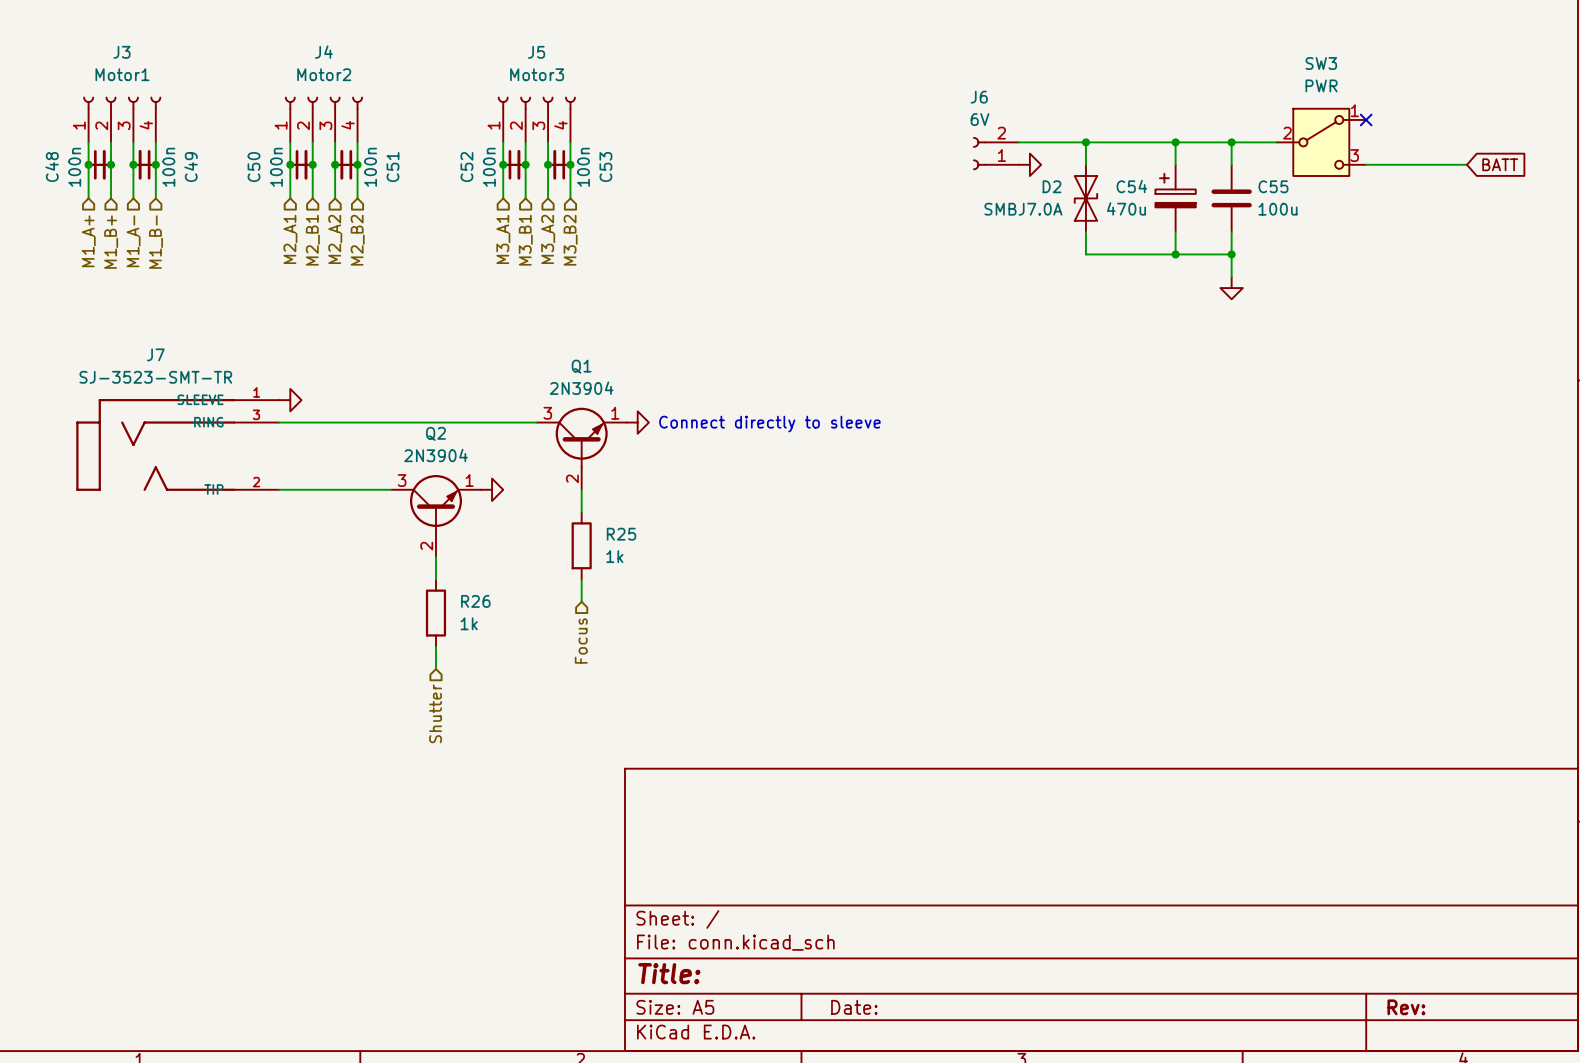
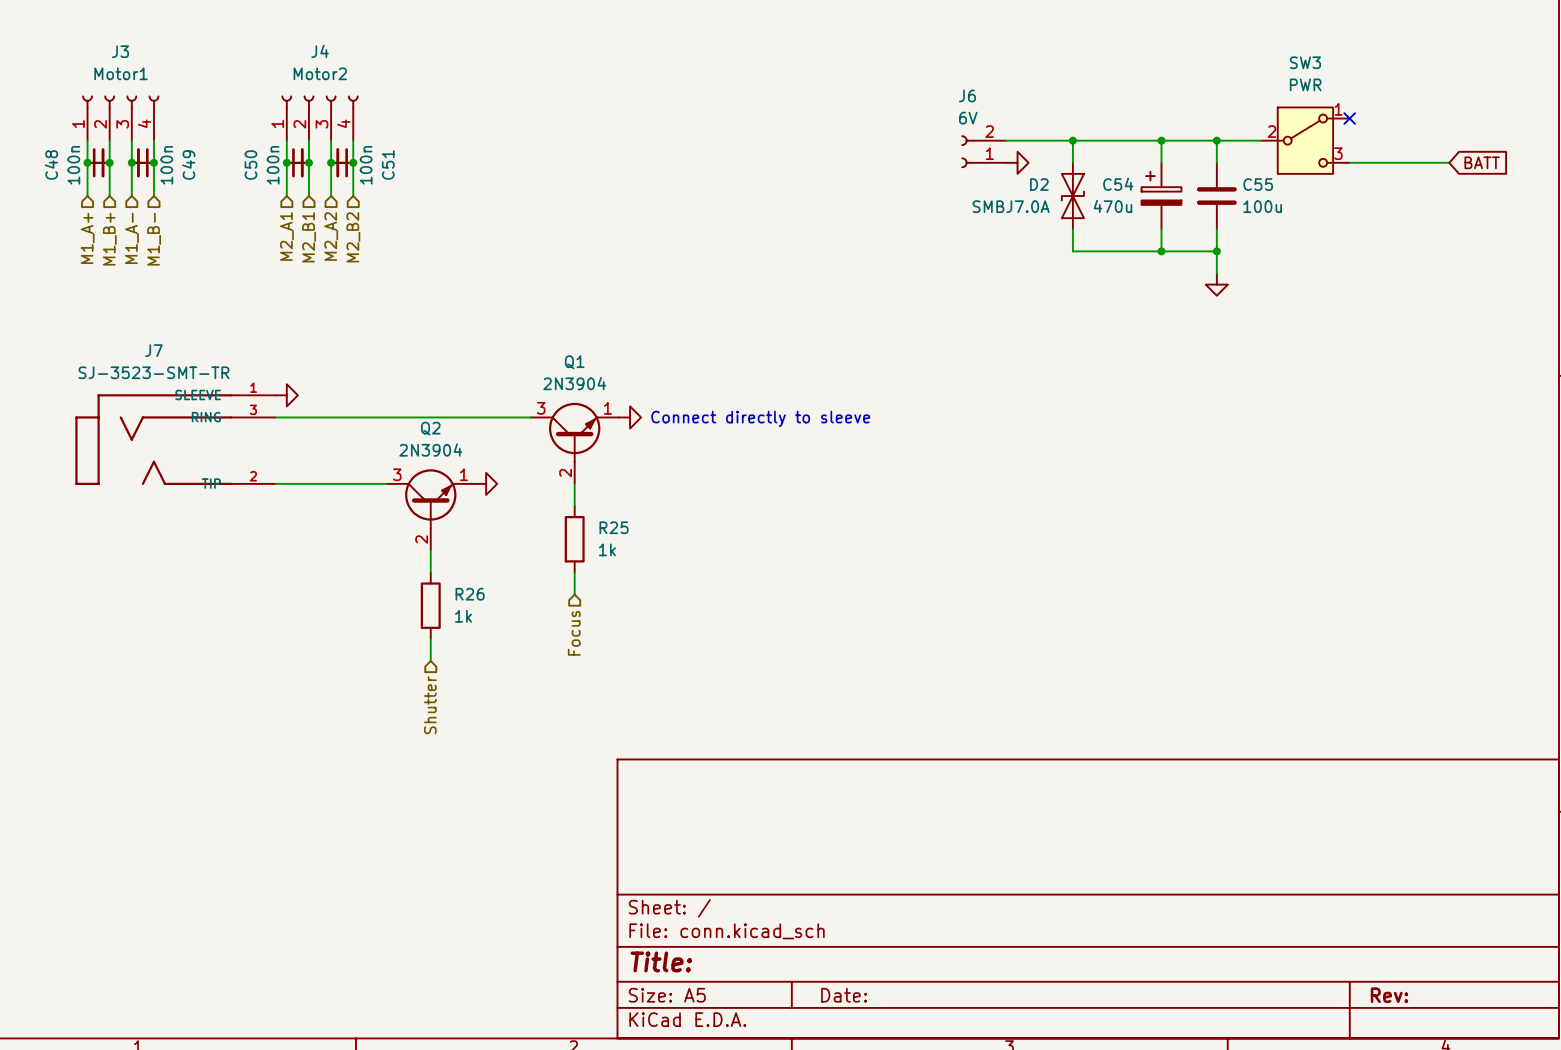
J5: Motor3 (536, 119) -> none
wire: (503, 142) (503, 198) -> none
wire: (525, 142) (525, 198) -> none
wire: (548, 142) (548, 198) -> none
wire: (570, 142) (570, 198) -> none
junction: (503, 164) -> none
C52: 100n (514, 164) -> none
junction: (525, 164) -> none
junction: (548, 164) -> none
C53: 100n (559, 164) -> none
junction: (570, 164) -> none
hierarchical label: M3_A1 (503, 239) -> none
hierarchical label: M3_A2 (548, 239) -> none
hierarchical label: M3_B1 (525, 240) -> none
hierarchical label: M3_B2 (570, 240) -> none

